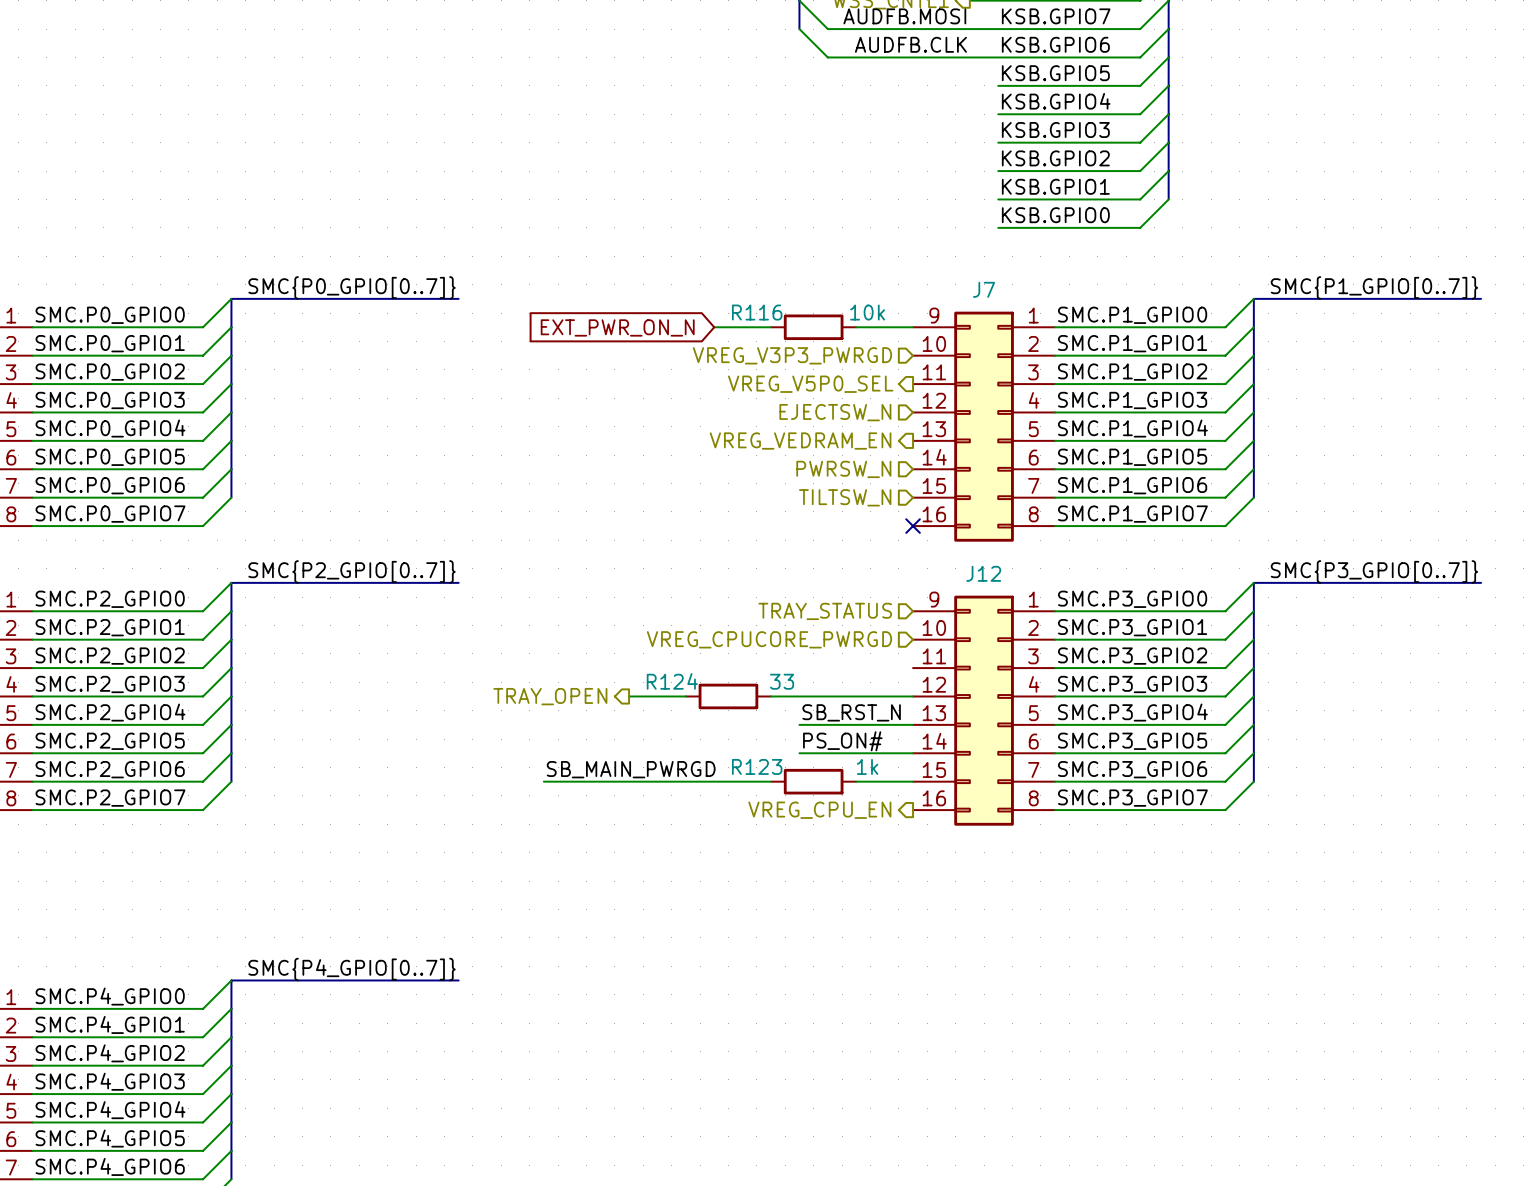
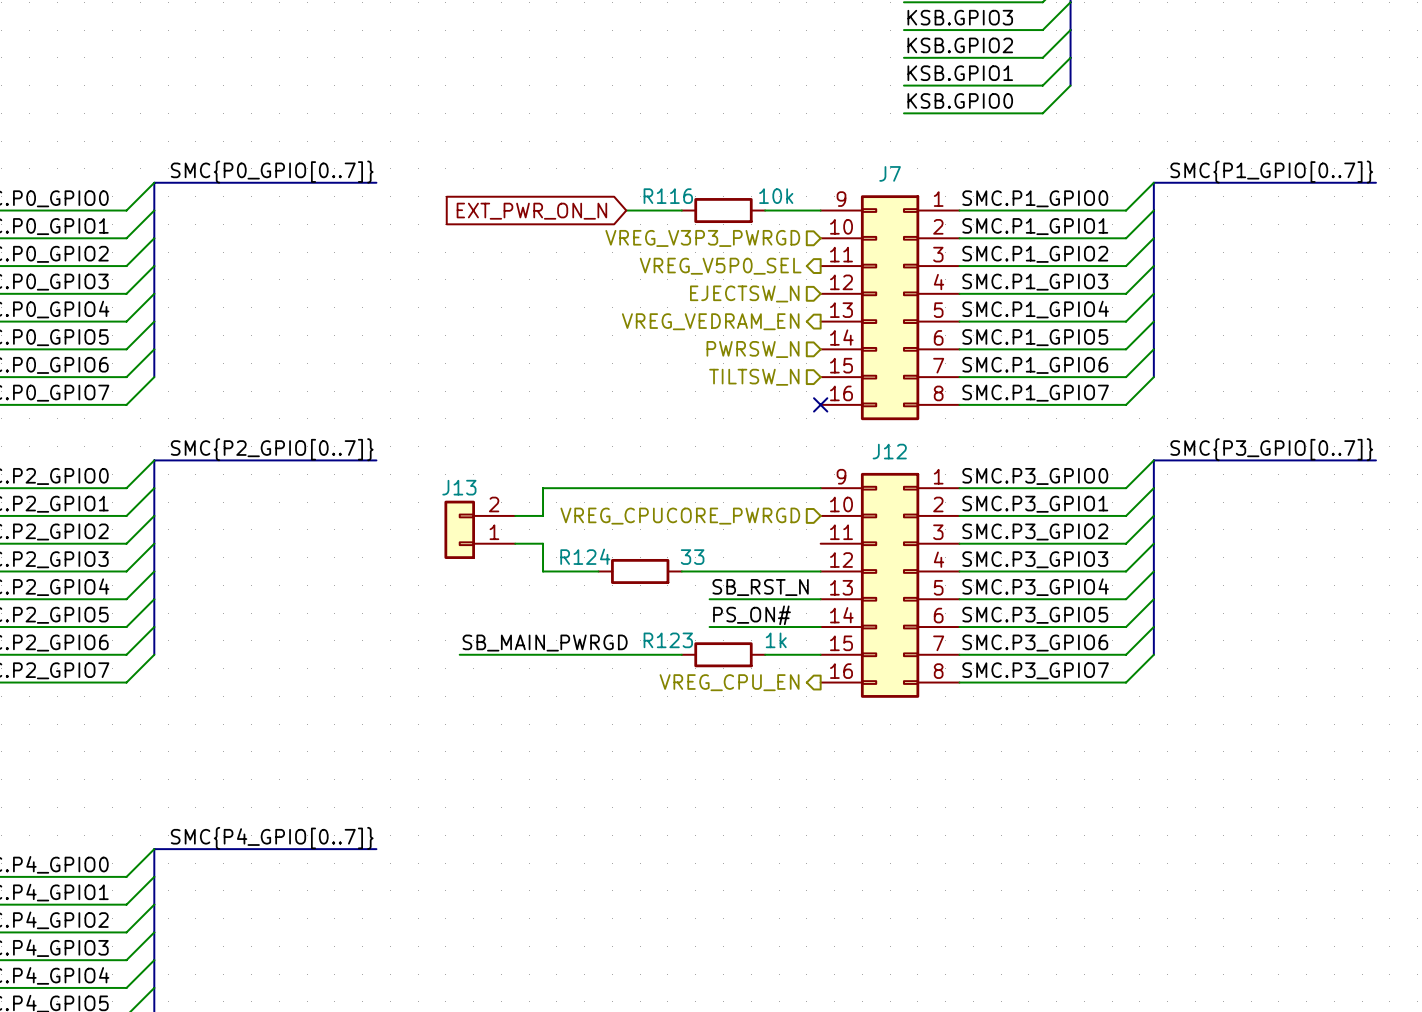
hierarchical label: TRAY_STATUS (825, 611) -> none
wire: none -> (820, 488) (543, 488) (543, 515) (515, 515)
J13: none -> (479, 529)
wire: none -> (515, 543) (543, 543) (543, 571)
hierarchical label: TRAY_OPEN (550, 696) -> none

